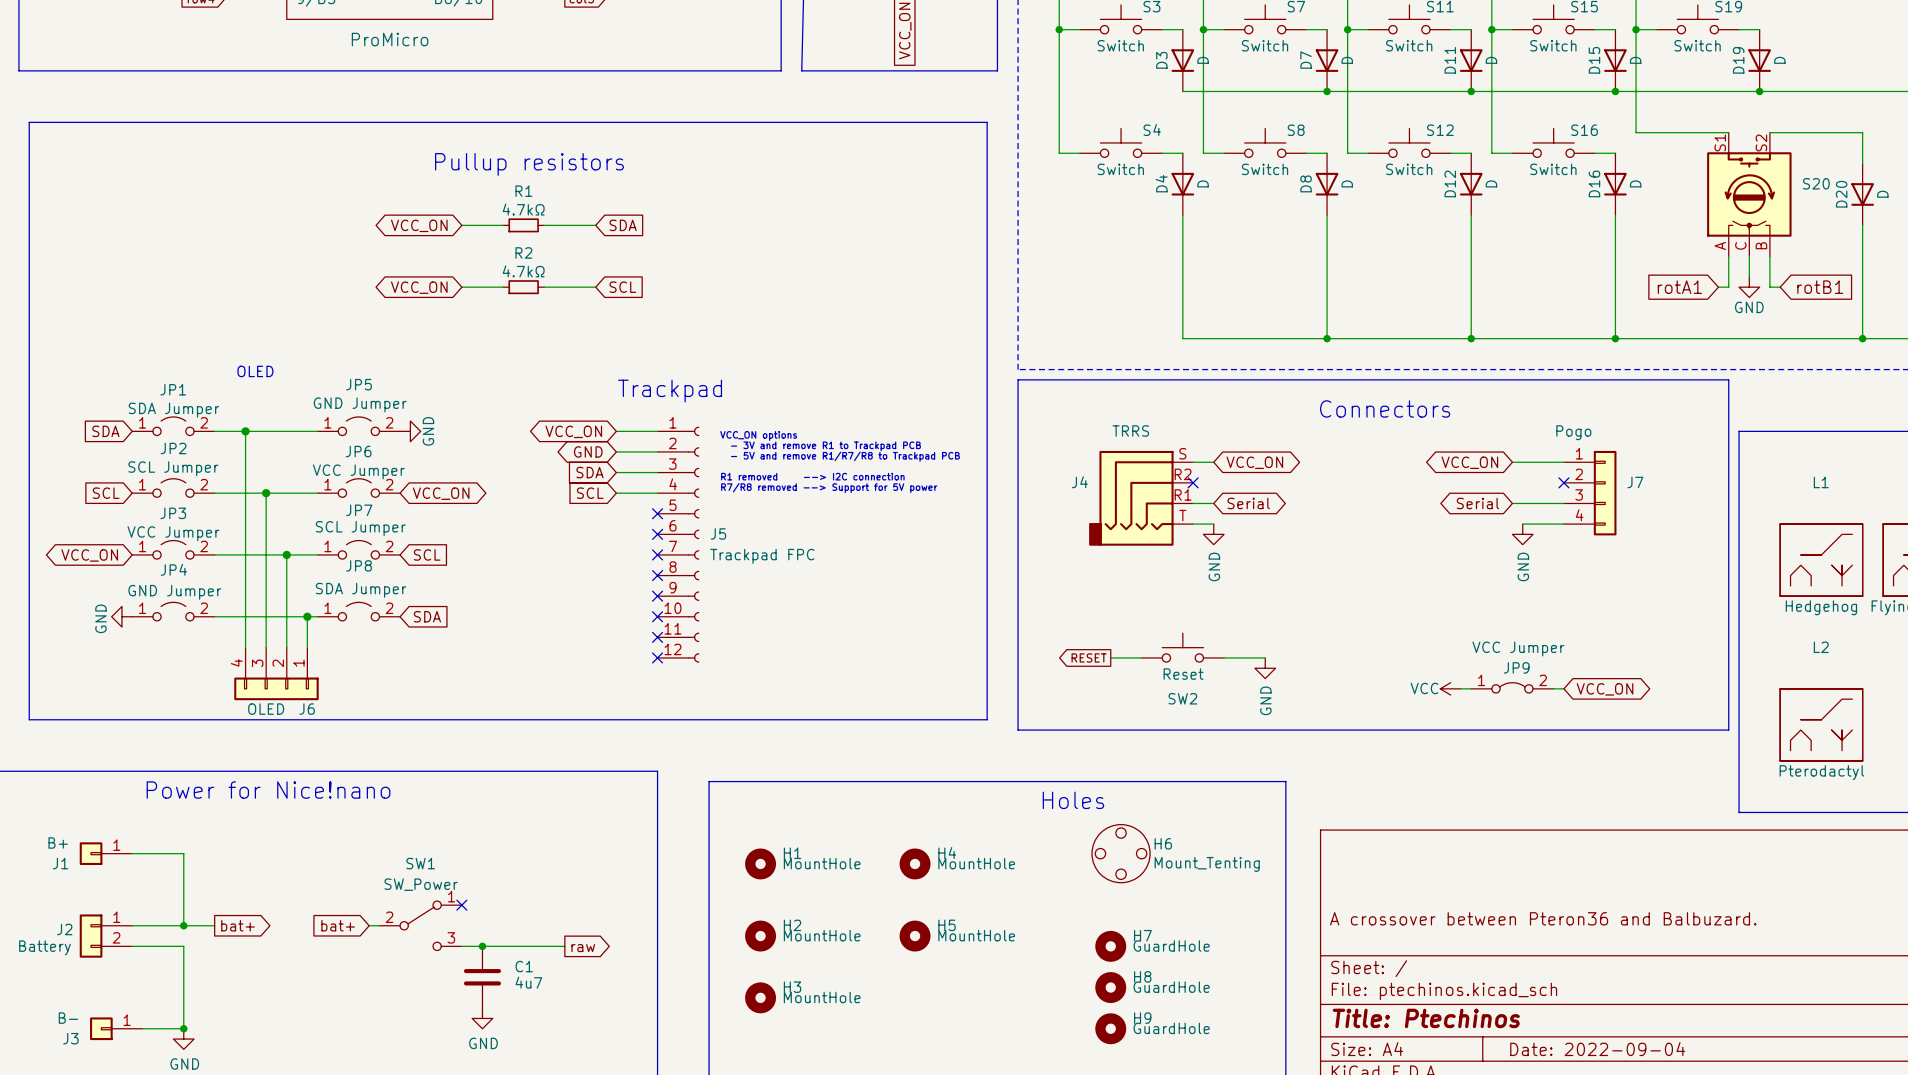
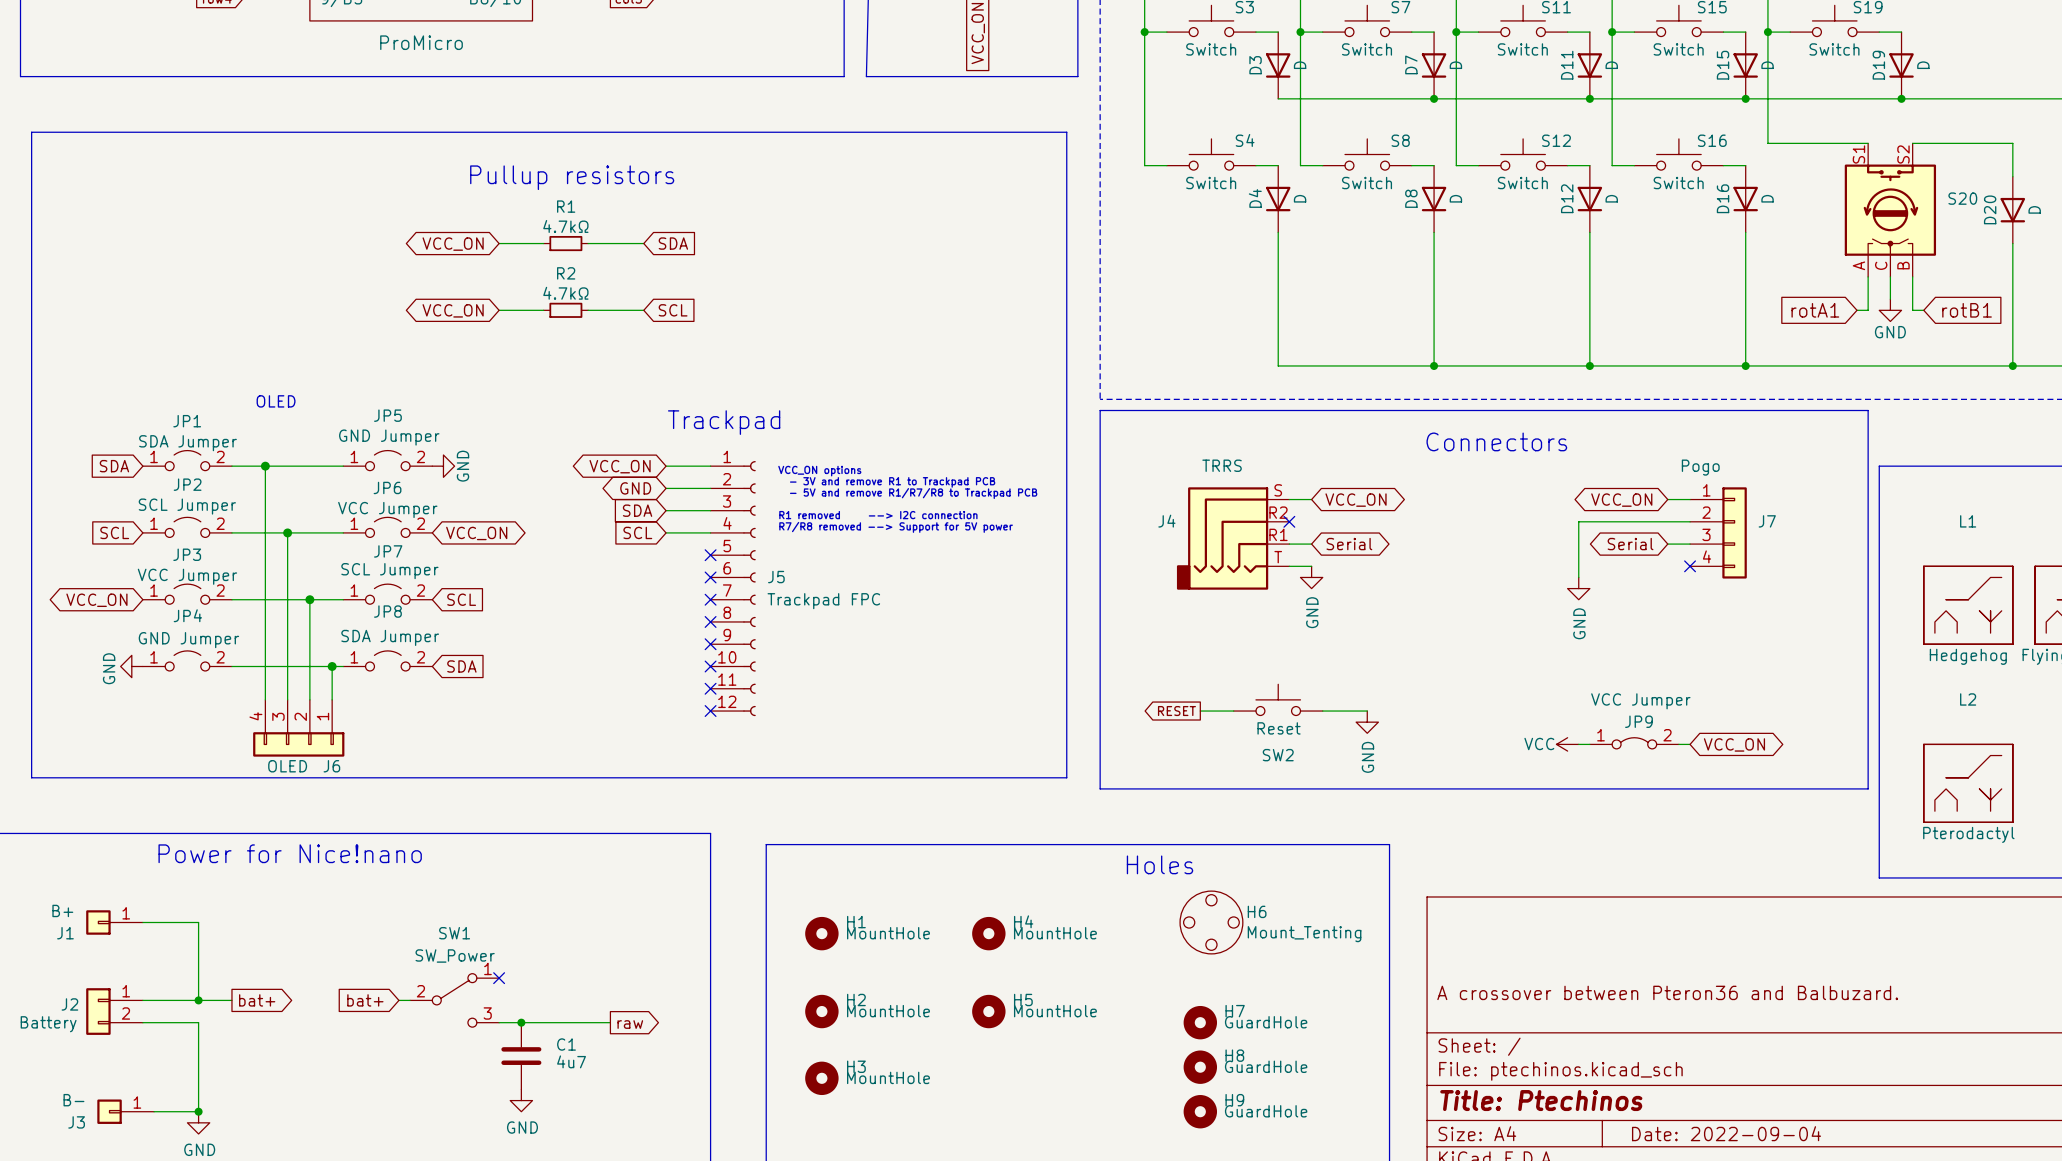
global label position: VCC_ON (1469, 462) -> VCC_ON (1621, 500)
wire: (1512, 462) (1543, 462) -> none
wire: none -> (1690, 521) (1578, 521) (1578, 577)
no-connect mark position: (1563, 482) -> (1690, 566)
global label position: Serial (1477, 503) -> Serial (1630, 544)
wire: (1512, 503) (1543, 503) -> none
wire: (1522, 524) (1563, 524) -> none
power symbol position: GND (1522, 534) -> GND (1578, 588)

